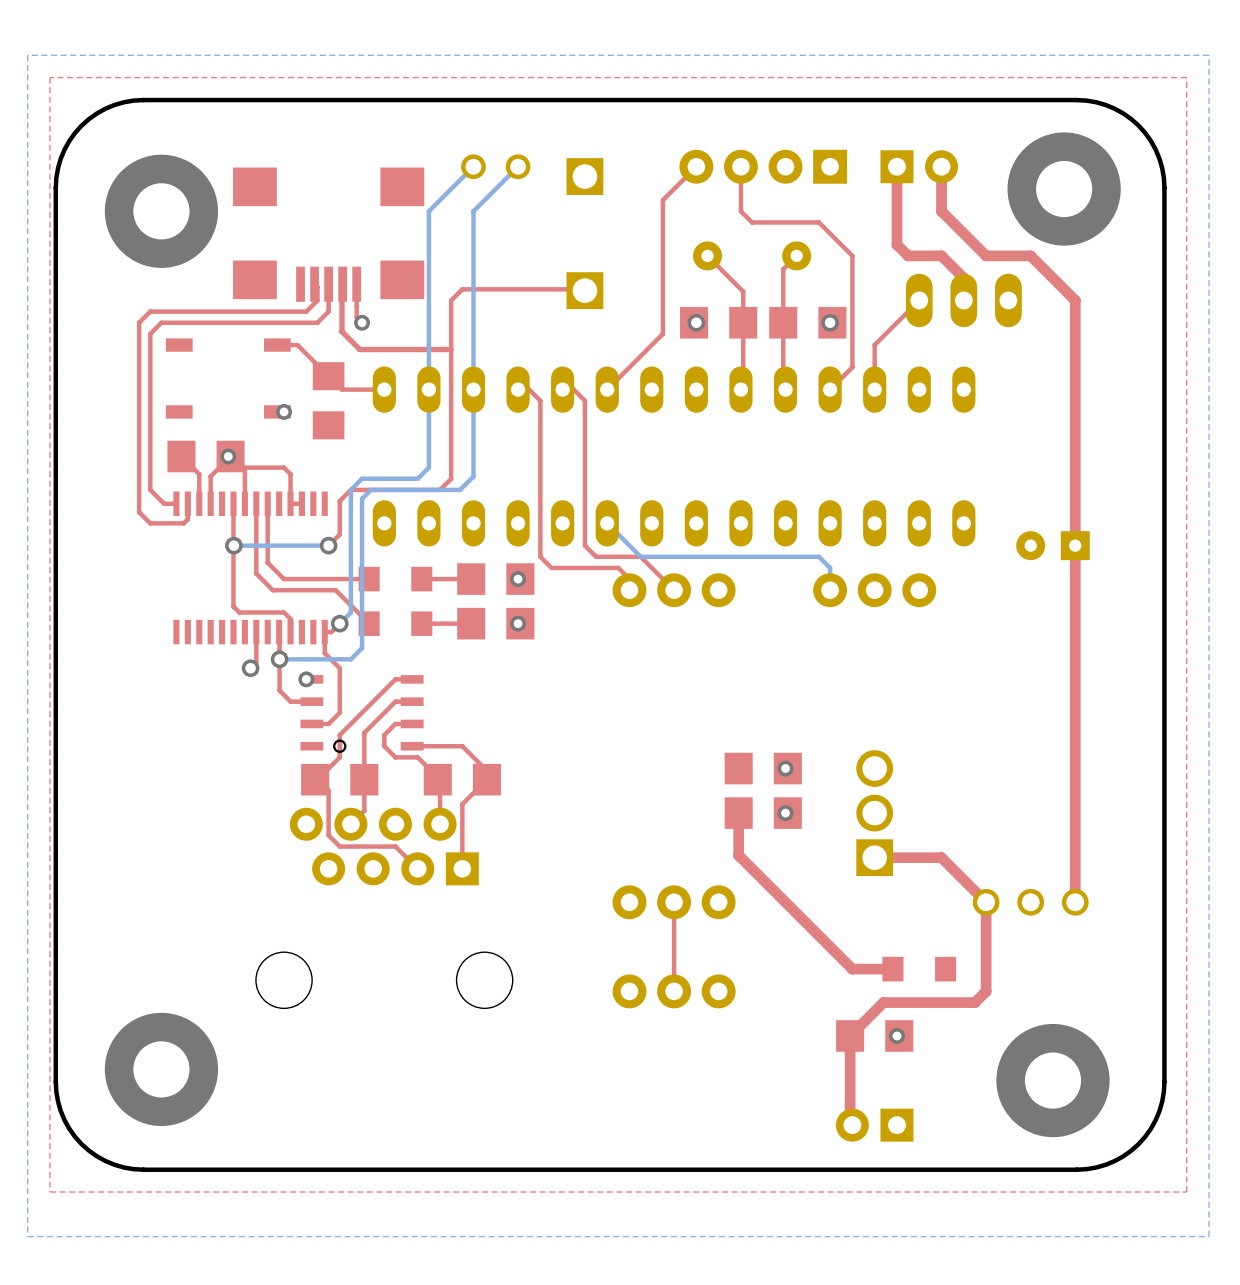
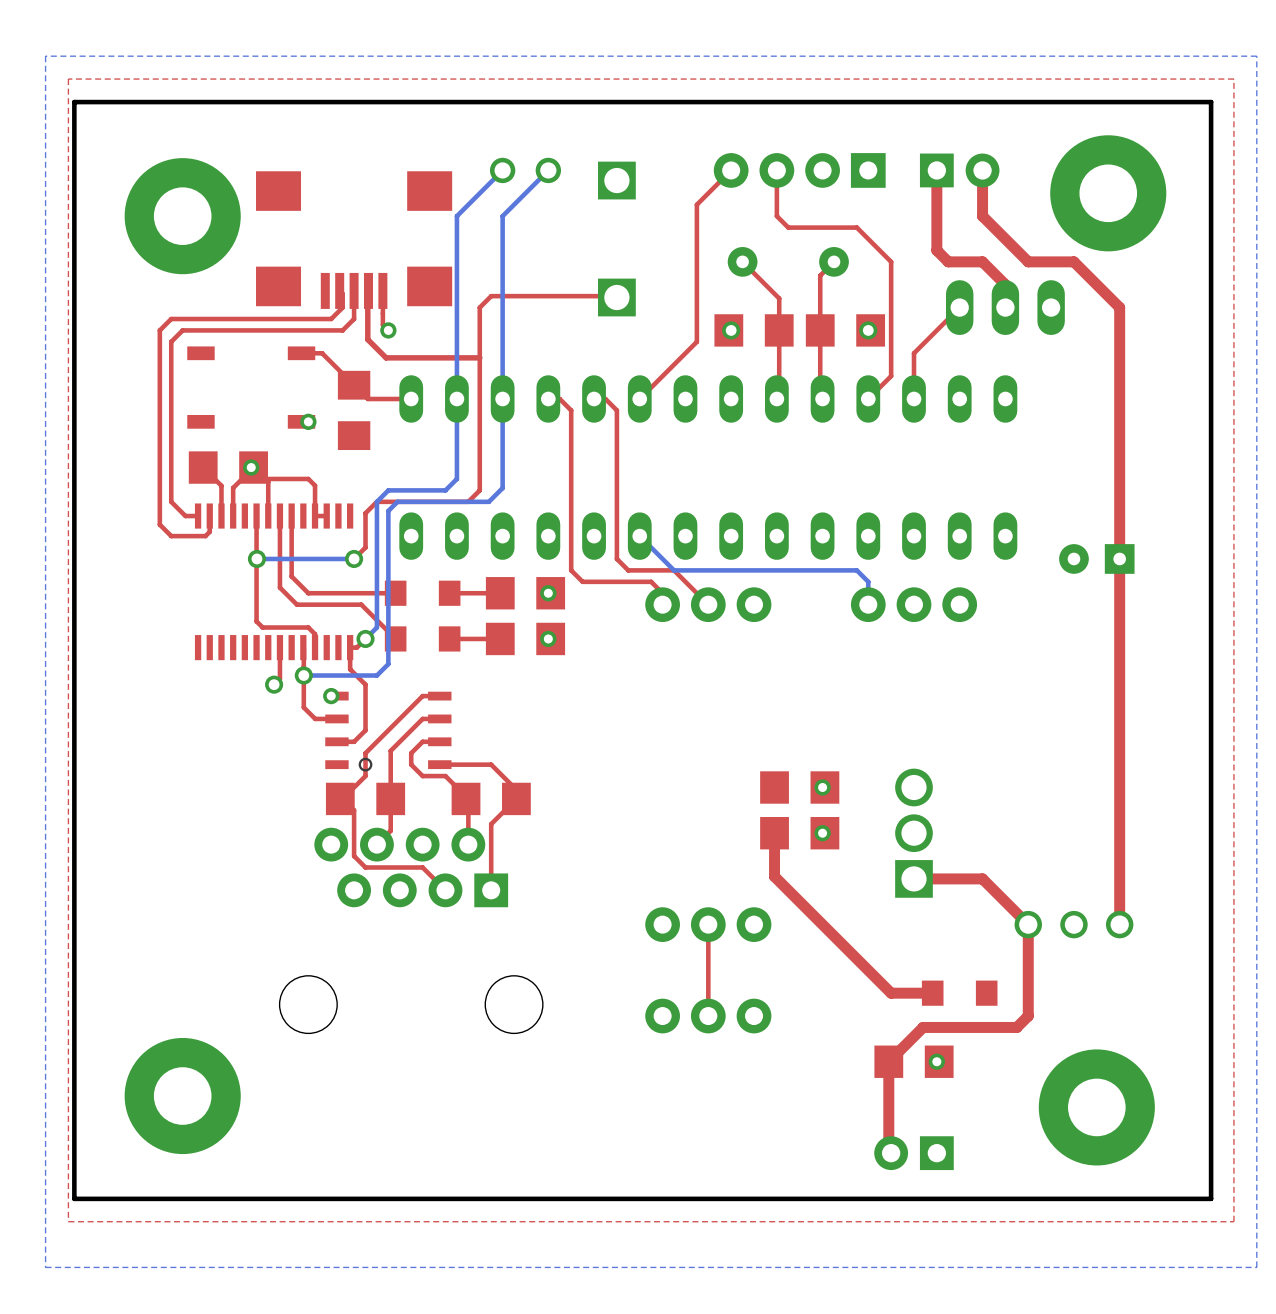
board edge: (143, 100) (114, 104) (96, 113) (81, 125) (69, 141) (60, 158) (55, 187) -> (164, 102) (74, 102) (74, 192)
board edge: (1076, 100) (1105, 104) (1123, 113) (1138, 125) (1150, 141) (1159, 158) (1164, 187) -> (1121, 102) (1211, 102) (1211, 192)
board edge: (55, 1081) (60, 1110) (69, 1128) (81, 1144) (96, 1156) (114, 1164) (143, 1169) -> (74, 1108) (74, 1198) (164, 1198)
board edge: (1164, 1081) (1159, 1110) (1150, 1128) (1138, 1144) (1123, 1156) (1105, 1164) (1076, 1169) -> (1211, 1108) (1211, 1198) (1121, 1198)

